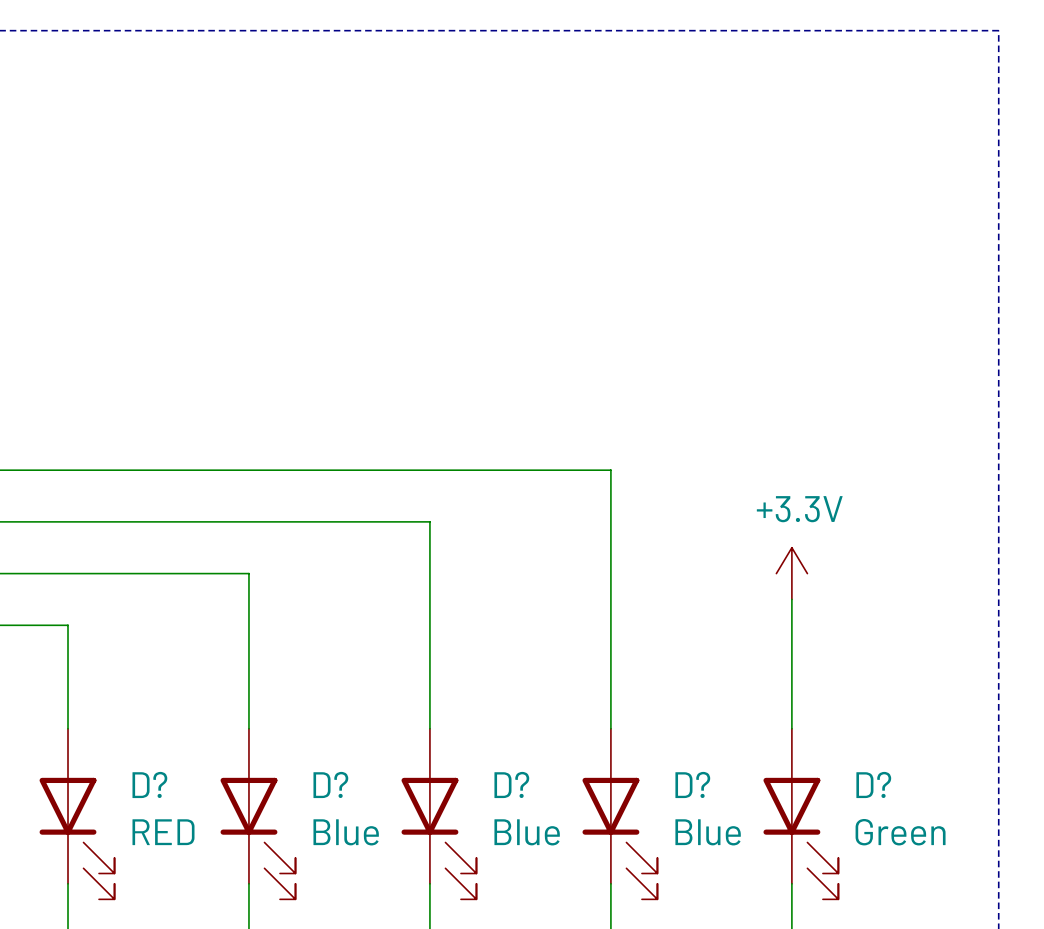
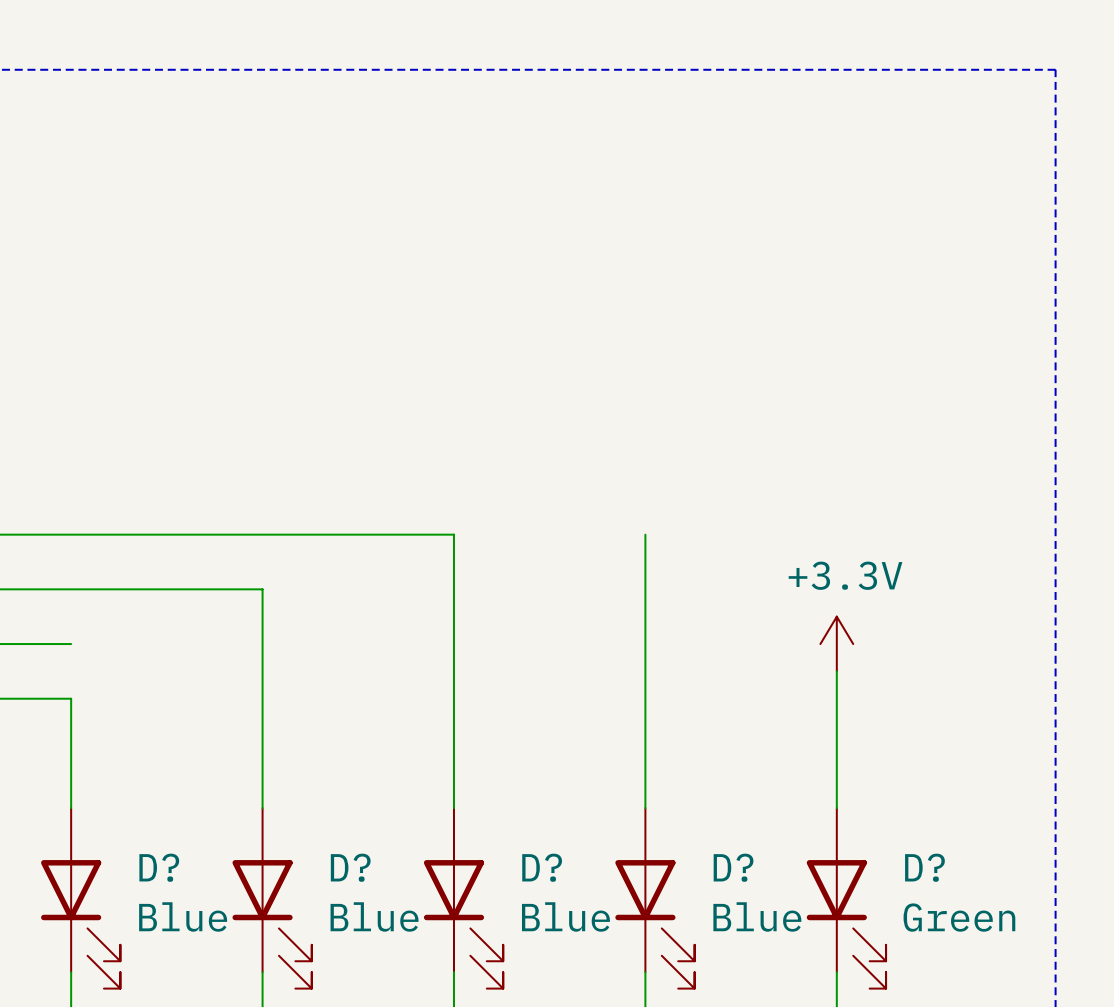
wire: (429, 470) (610, 470) -> (453, 534) (453, 589)
wire: (248, 521) (429, 521) -> (262, 589) (262, 644)
wire: (68, 573) (248, 573) -> none
D? value: RED (163, 832) -> Blue (183, 916)

